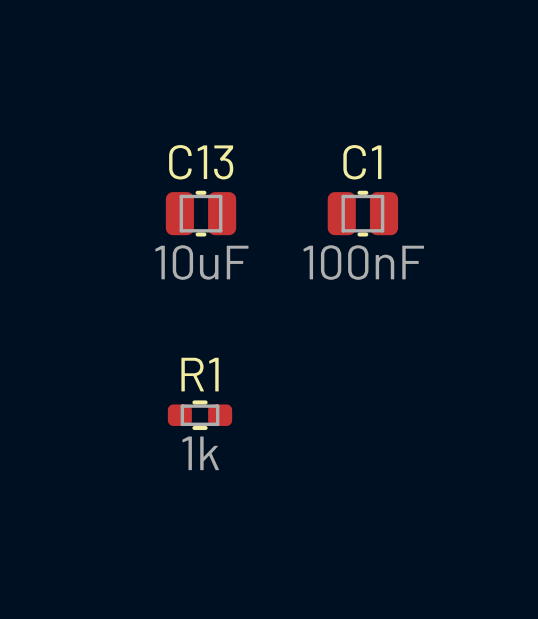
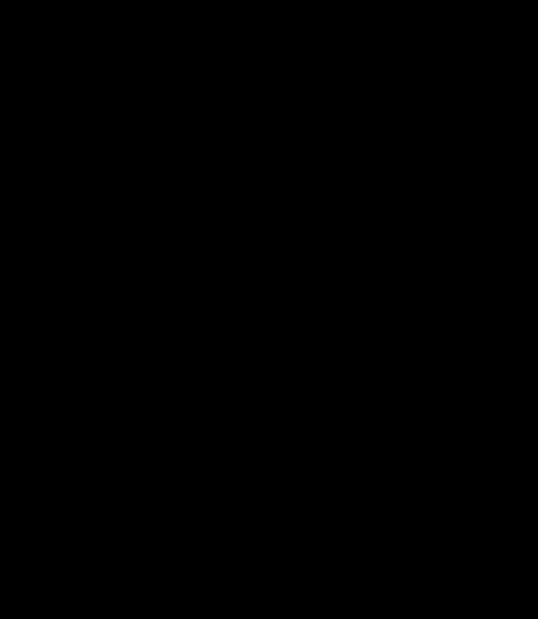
C13: 10uF (201, 213) -> none
C1: 100nF (362, 213) -> none
R1: 1k (200, 415) -> none

